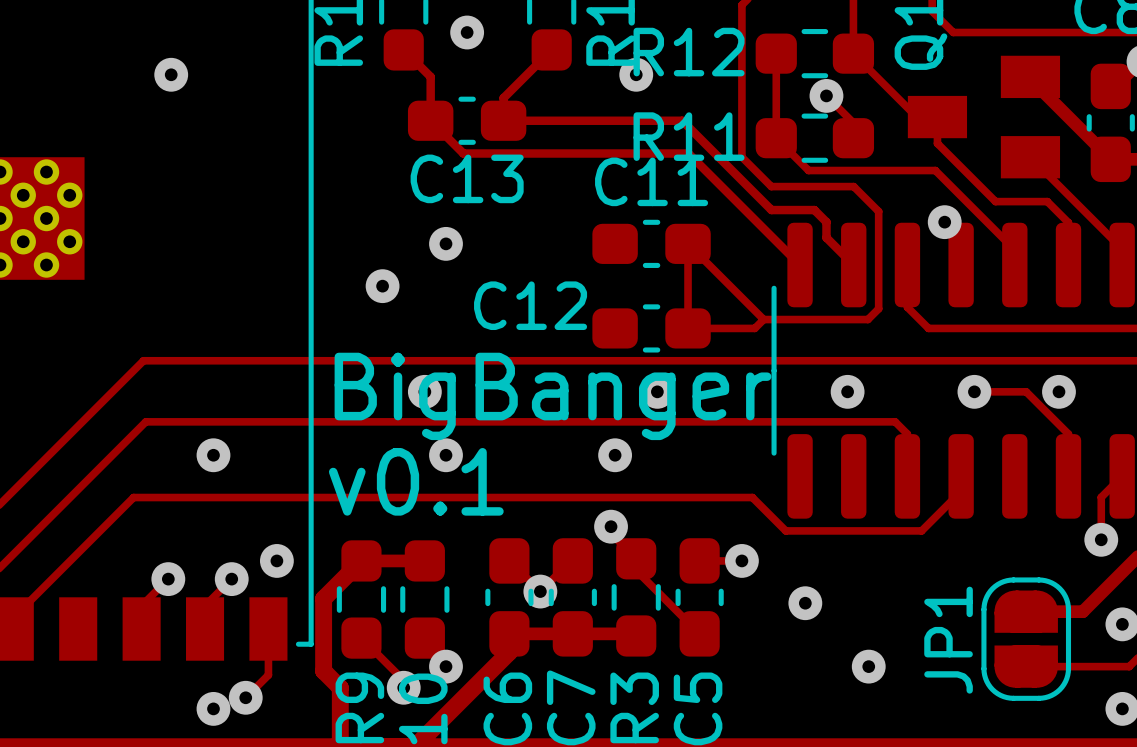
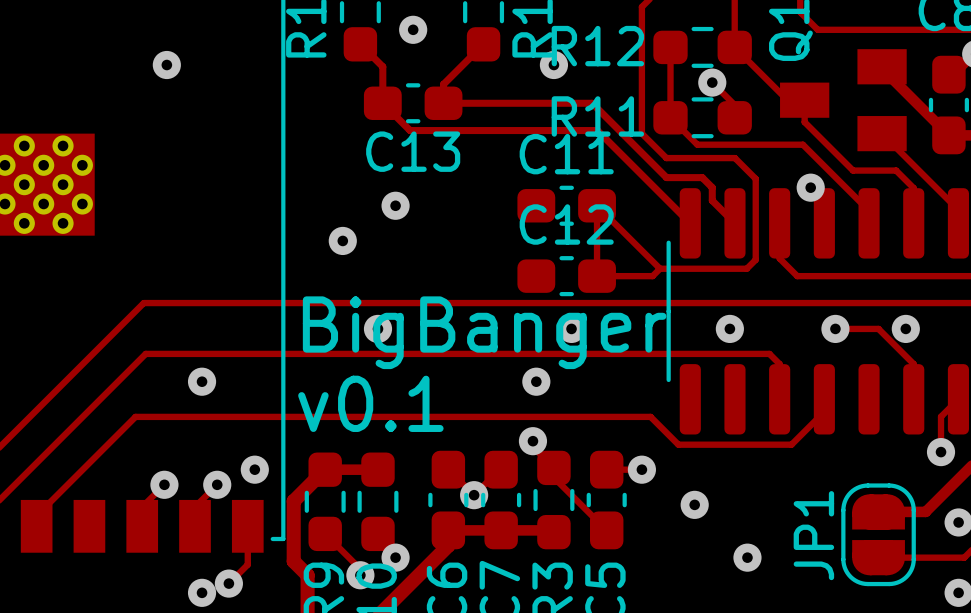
C12 name position: C12 (530, 305) -> C12 (566, 224)
via: (446, 455) -> none

